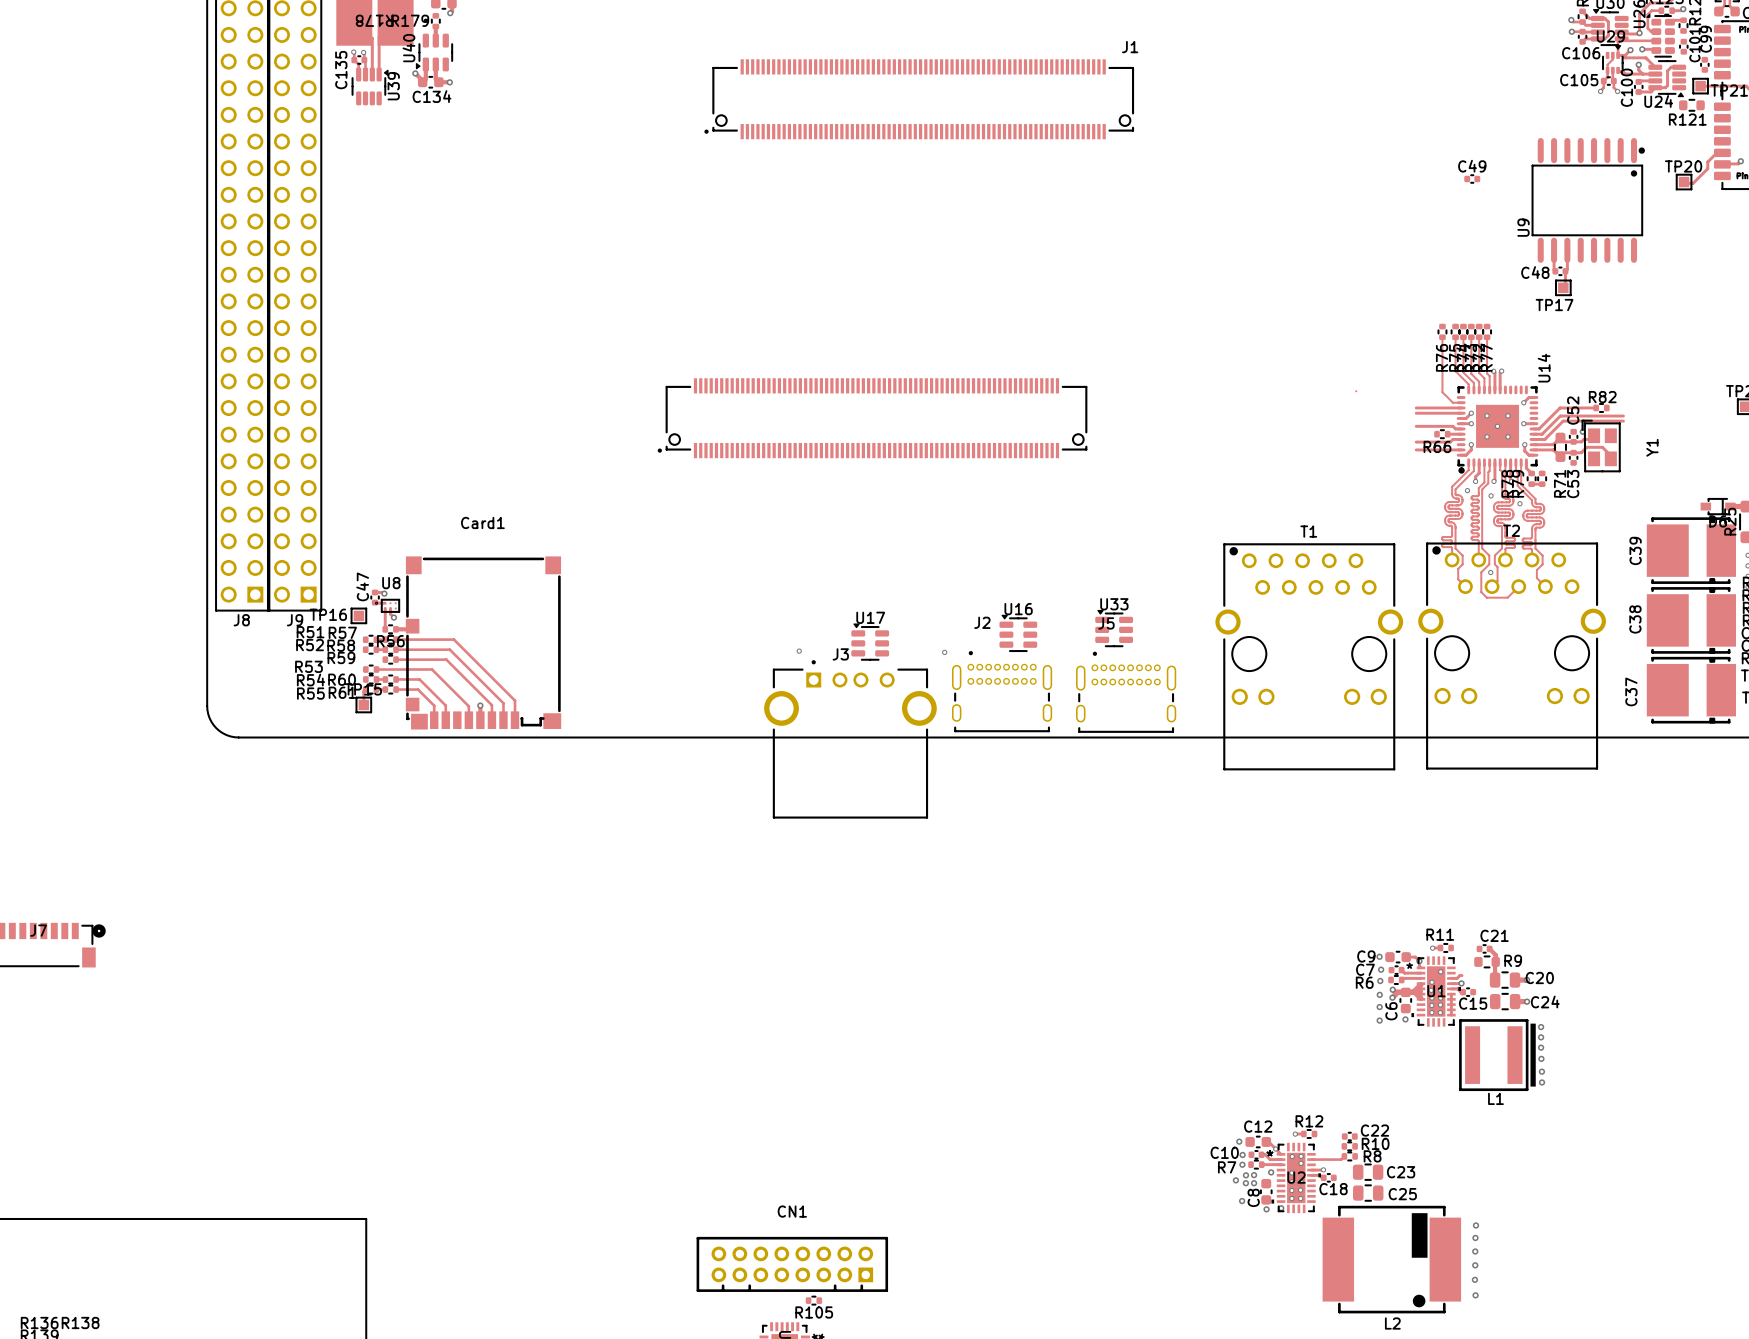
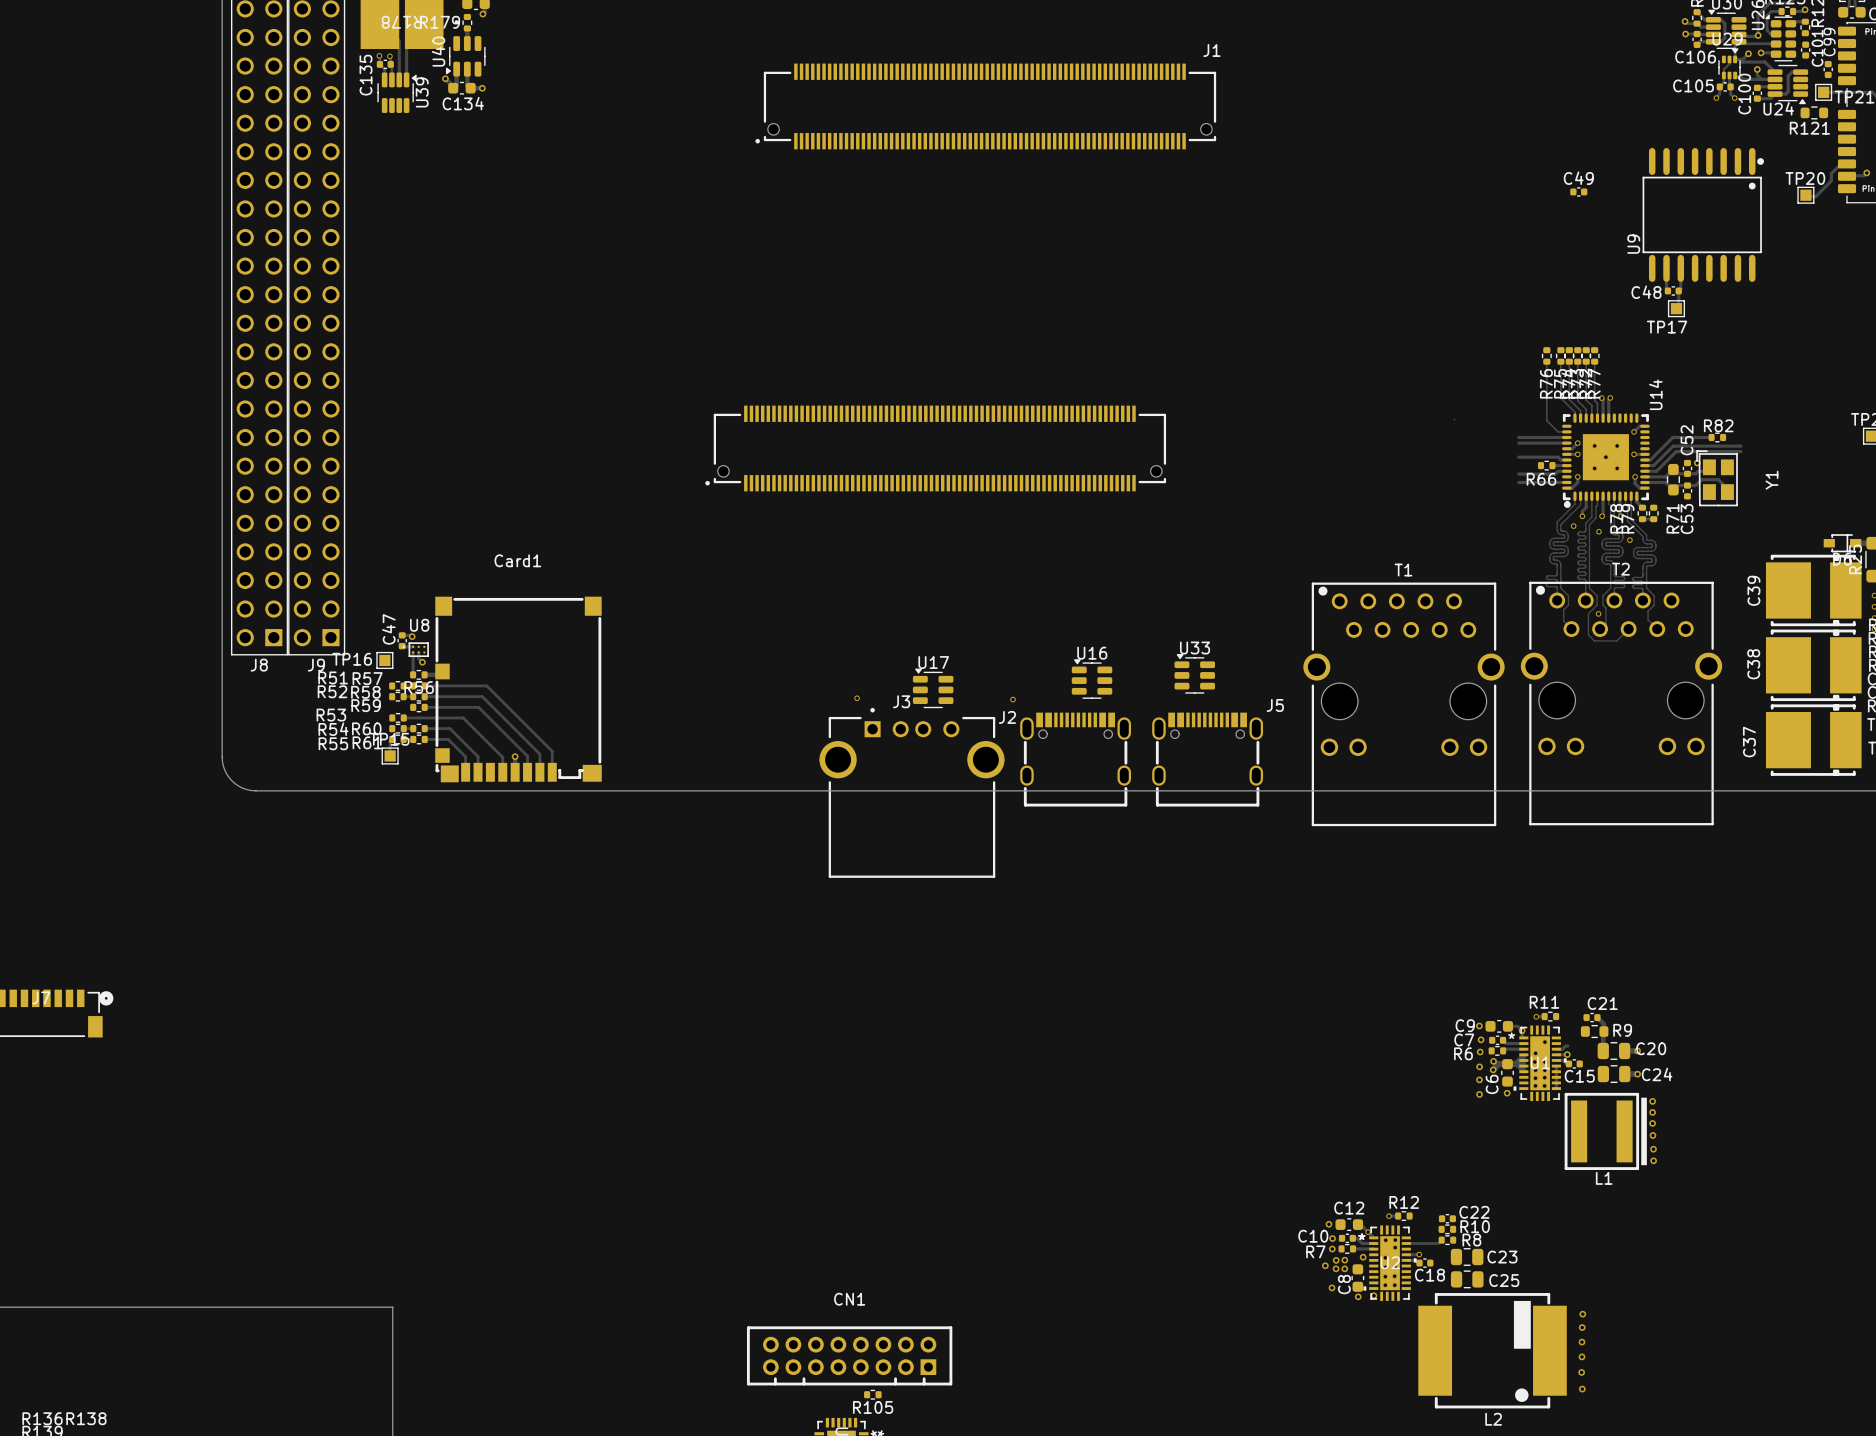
J2 name position: J2 (982, 622) -> J2 (1007, 717)
J5 name position: J5 (1106, 623) -> J5 (1275, 705)
J2 footprint: [951, 651, 1053, 733] -> [1020, 712, 1132, 807]
J5 footprint: [1076, 651, 1177, 733] -> [1152, 712, 1264, 807]

